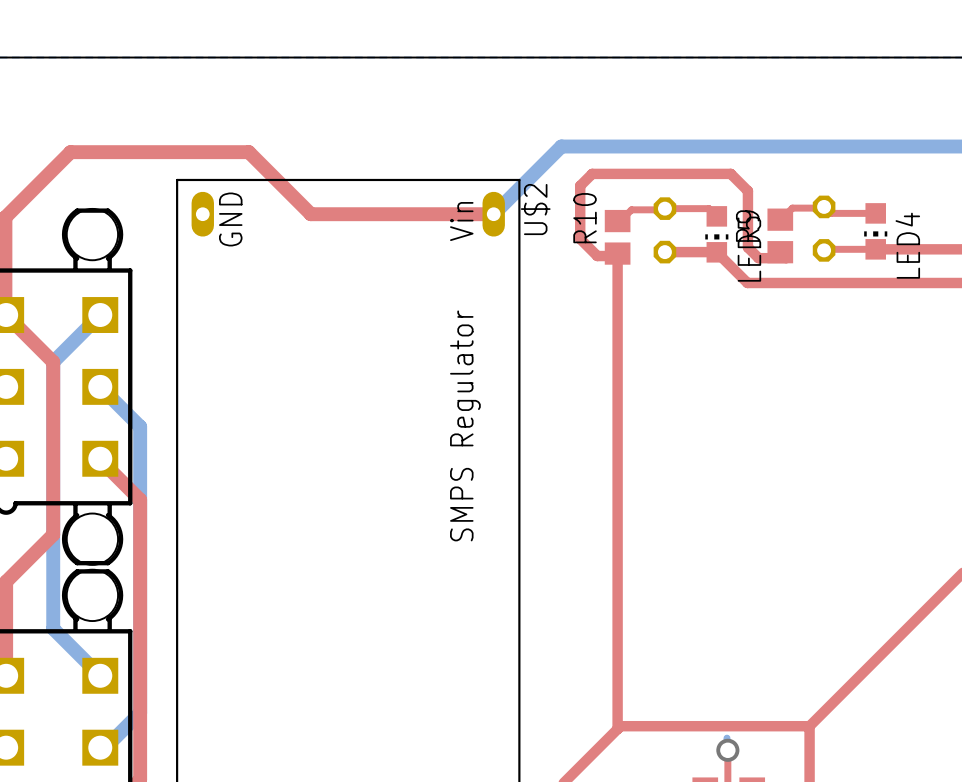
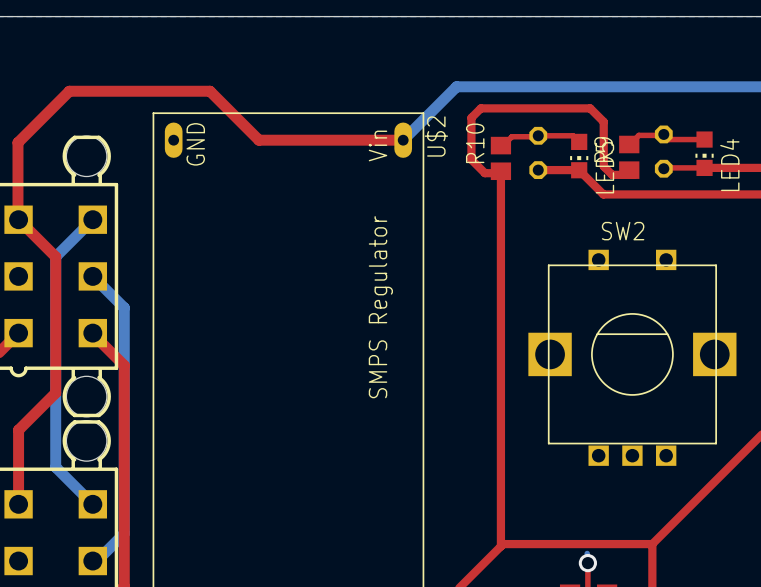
SW2: none -> (632, 357)

